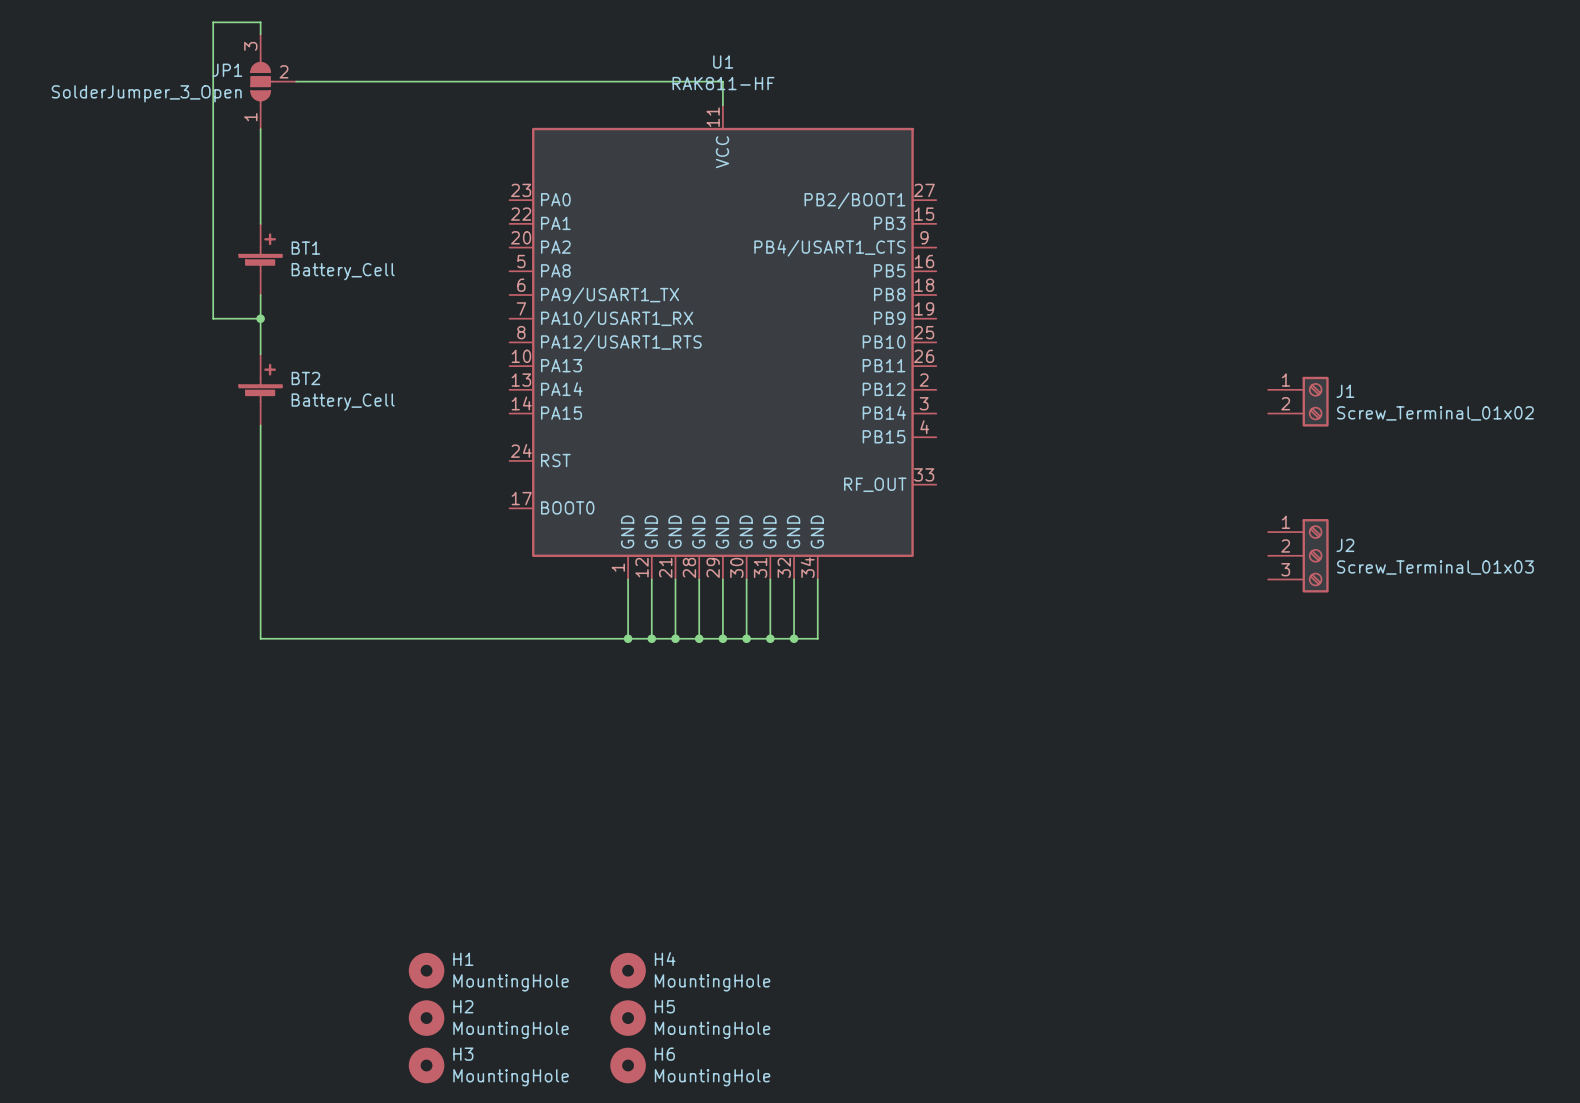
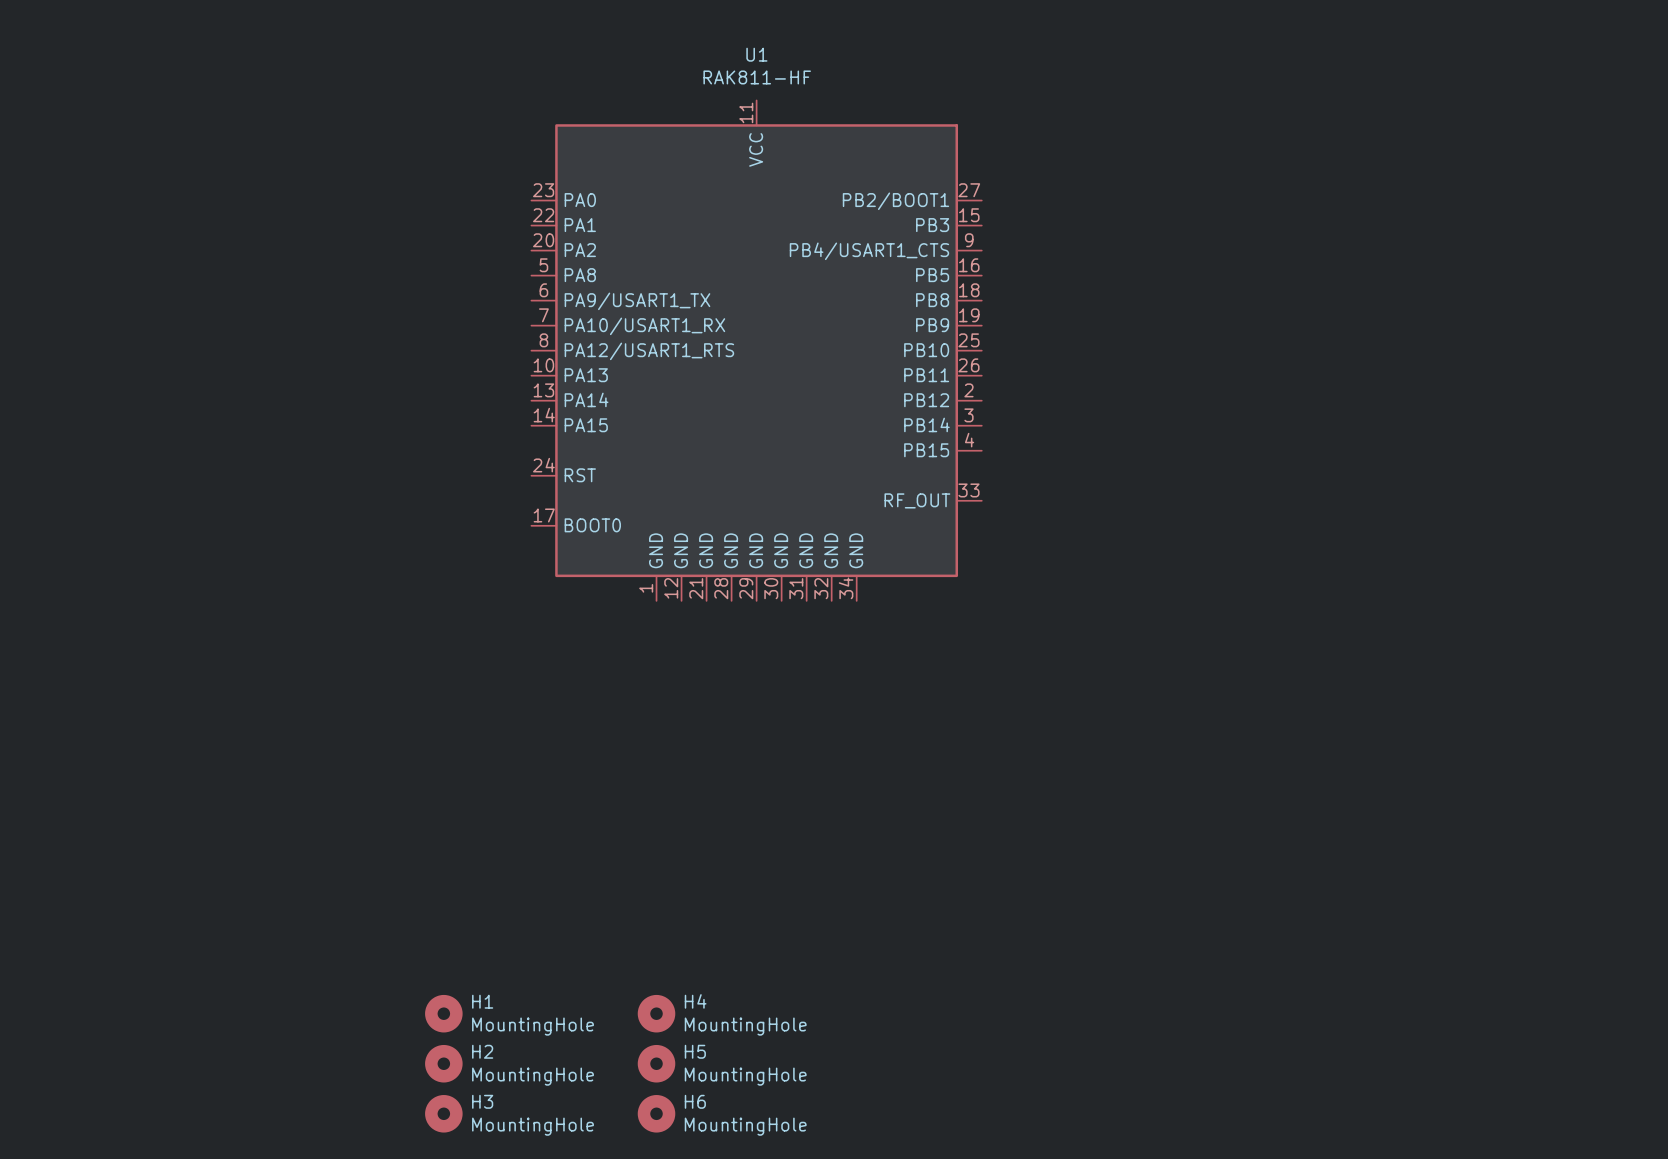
wire: (260, 34) (260, 22) (213, 22) (213, 318) (260, 318) -> none
JP1: SolderJumper_3_Open (273, 81) -> none
wire: (296, 81) (722, 81) (722, 105) -> none
wire: (260, 129) (260, 223) -> none
BT1: Battery_Cell (260, 259) -> none
wire: (260, 294) (260, 354) -> none
junction: (260, 318) -> none
BT2: Battery_Cell (260, 389) -> none
J1: Screw_Terminal_01x02 (1298, 401) -> none
wire: (260, 425) (260, 638) (817, 638) (817, 579) -> none
J2: Screw_Terminal_01x03 (1298, 555) -> none
wire: (628, 579) (628, 638) -> none
wire: (651, 579) (651, 638) -> none
wire: (675, 579) (675, 638) -> none
wire: (699, 579) (699, 638) -> none
wire: (722, 579) (722, 638) -> none
wire: (746, 579) (746, 638) -> none
wire: (770, 579) (770, 638) -> none
wire: (794, 579) (794, 638) -> none
junction: (628, 638) -> none
junction: (651, 638) -> none
junction: (675, 638) -> none
junction: (699, 638) -> none
junction: (722, 638) -> none
junction: (746, 638) -> none
junction: (770, 638) -> none
junction: (794, 638) -> none

